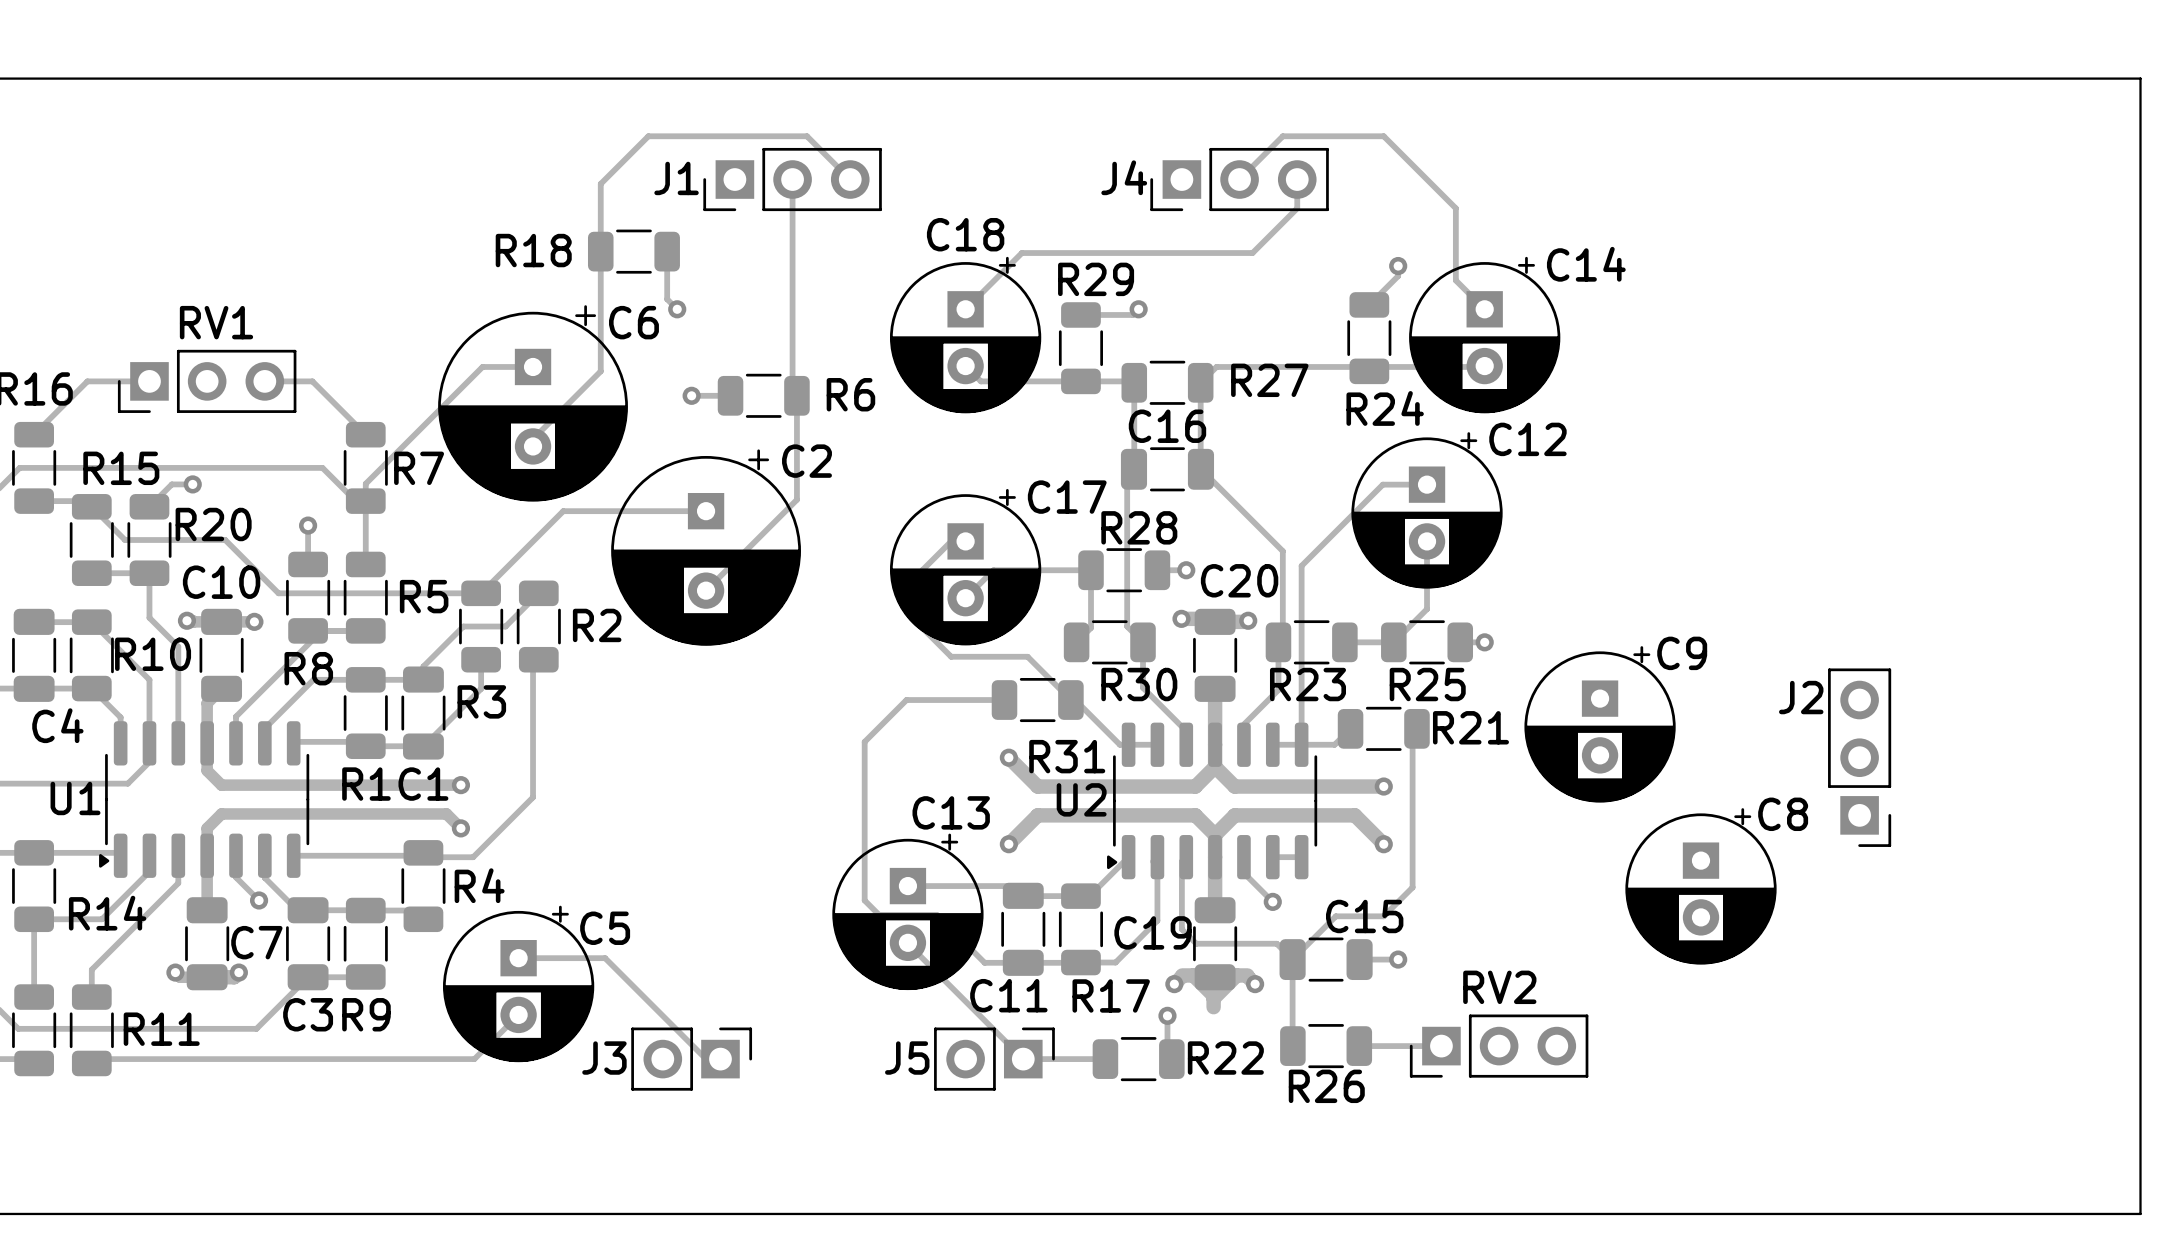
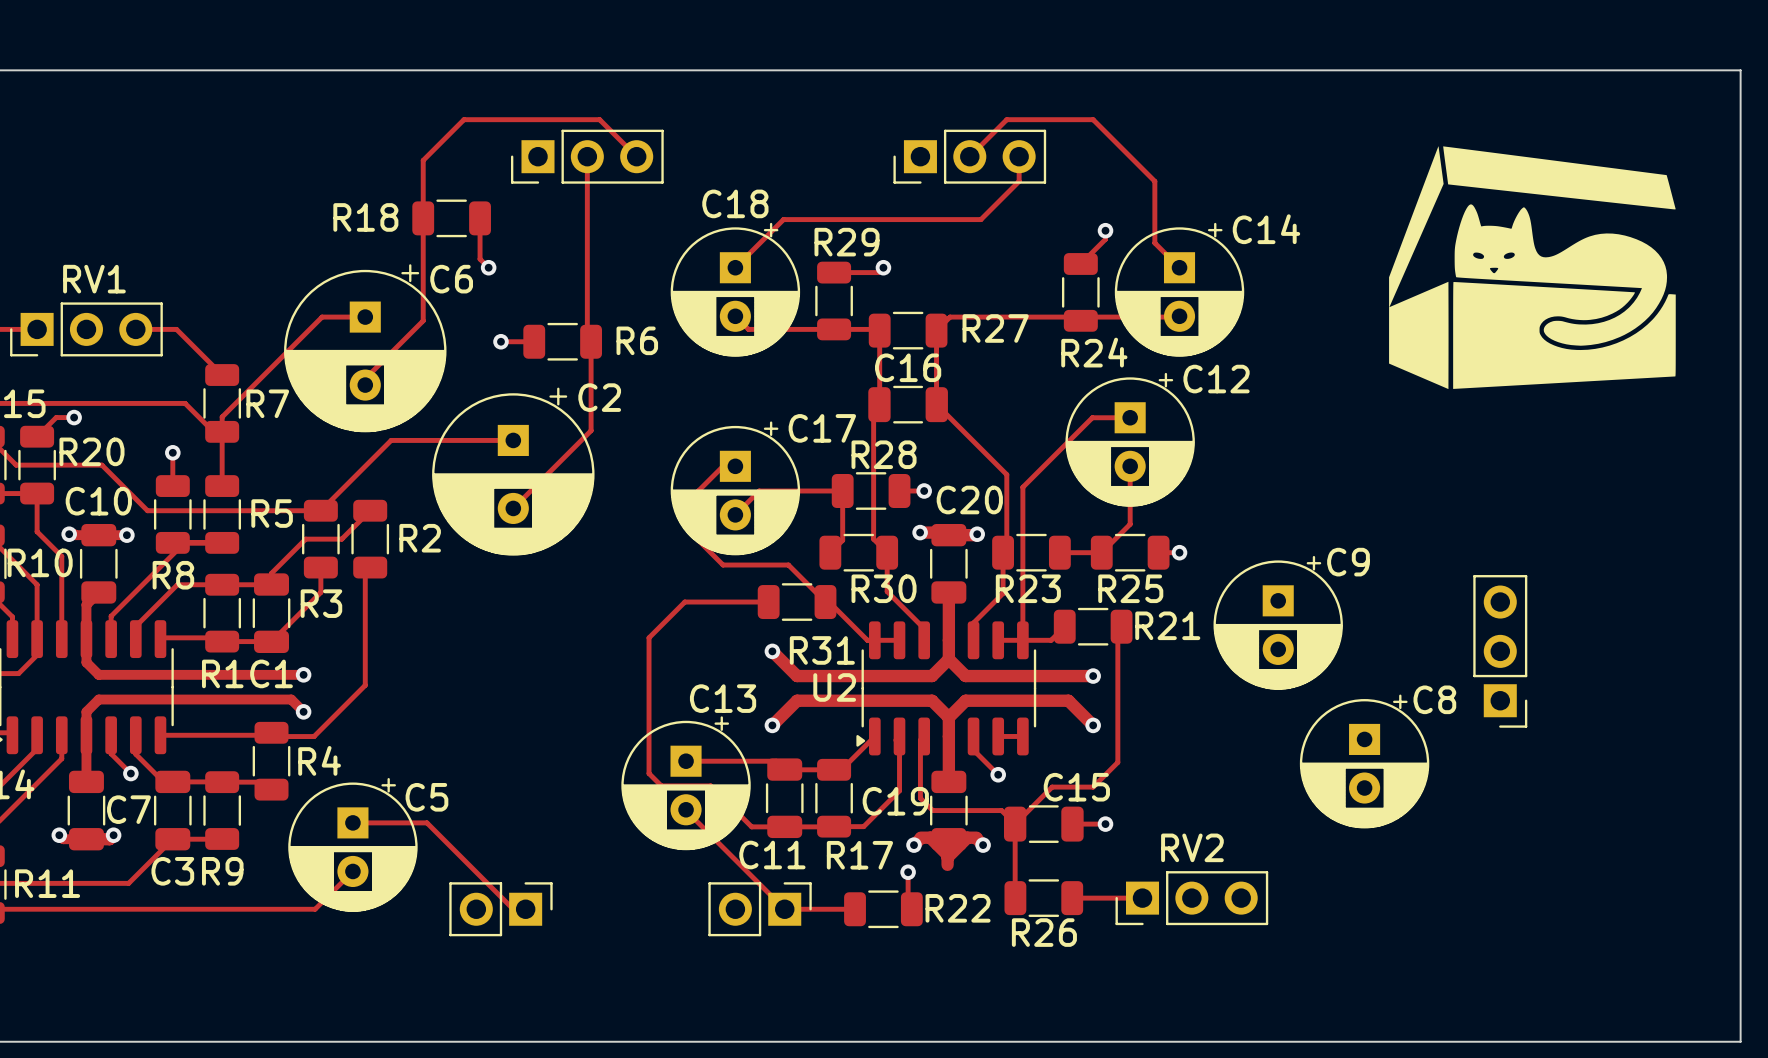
drawing: none -> [1389, 146, 1676, 390]
J4 name: J4 (1124, 177) -> none
J1 name: J1 (676, 178) -> none
J2 name: J2 (1801, 697) -> none
J3 name: J3 (604, 1058) -> none
J5 name: J5 (907, 1058) -> none

